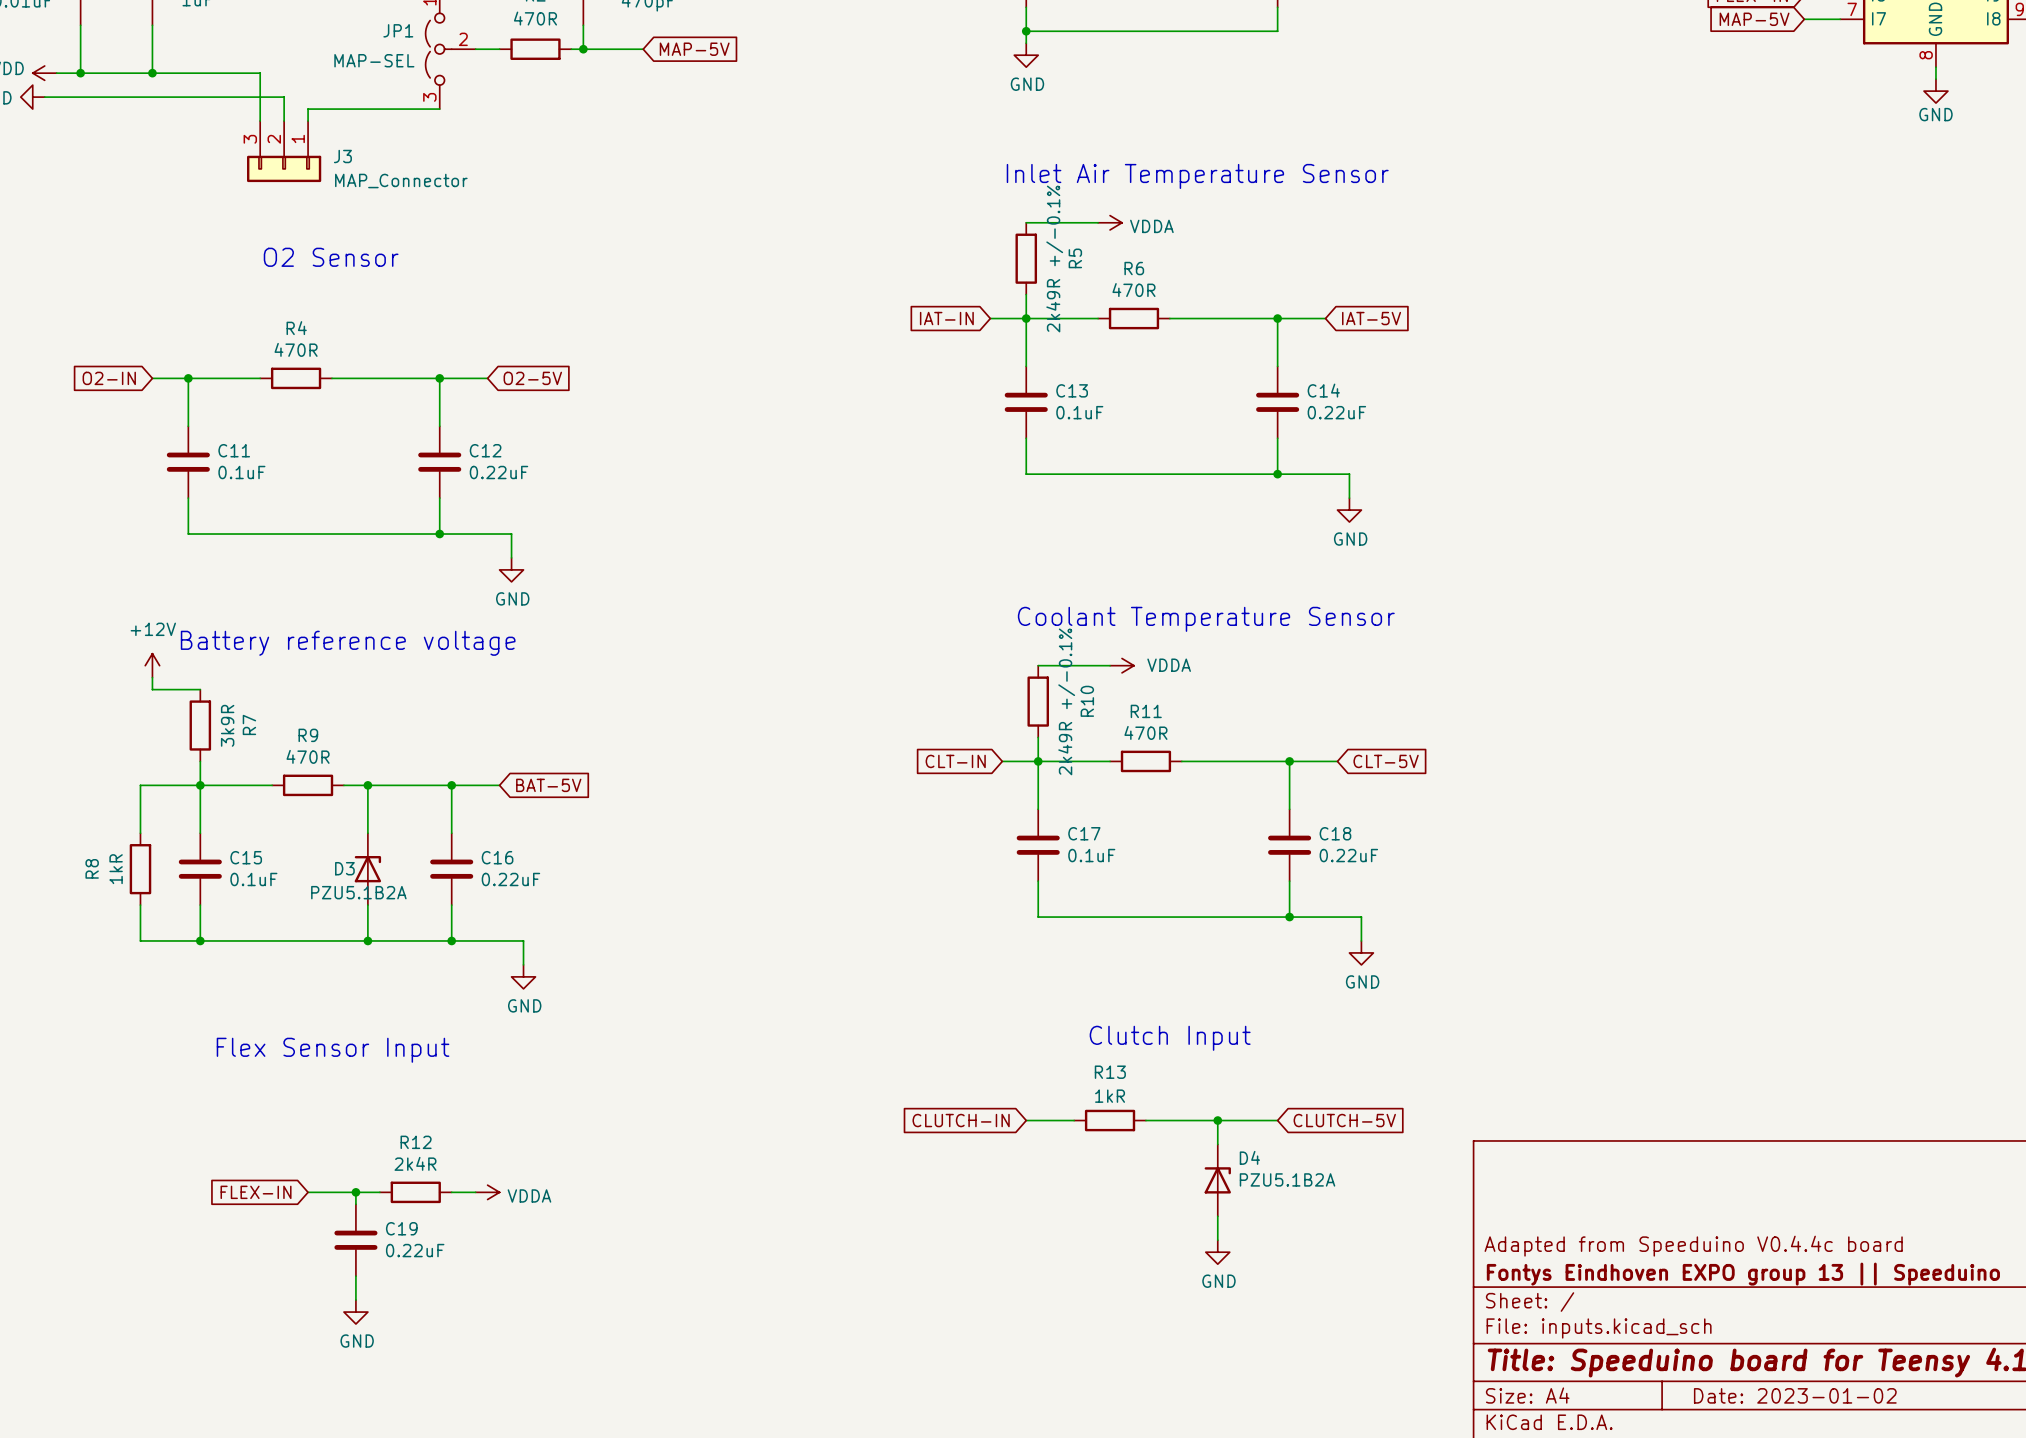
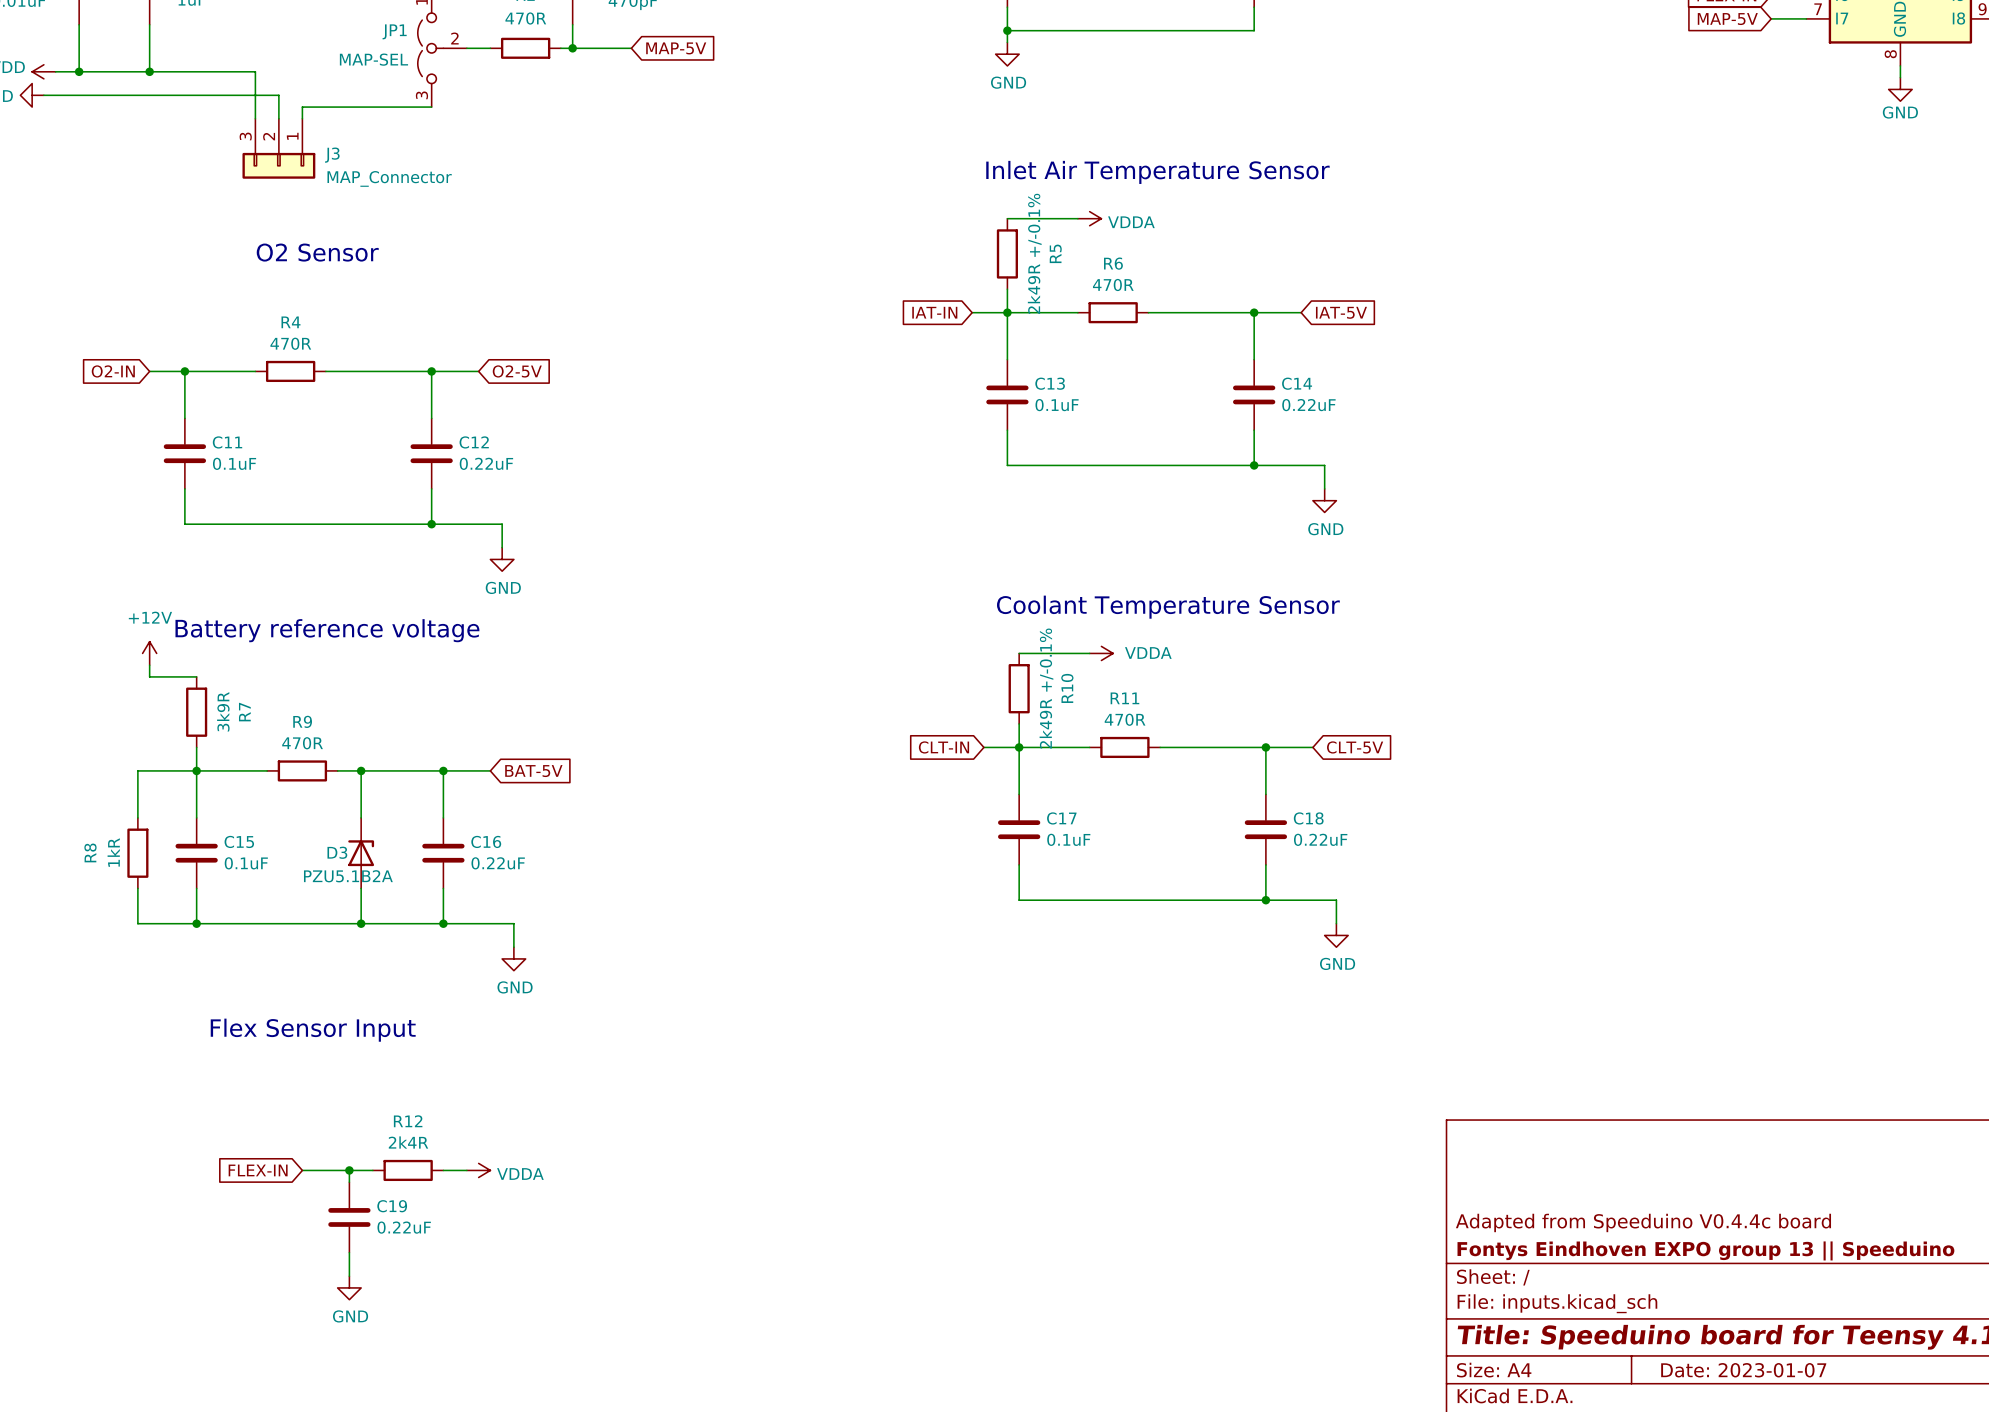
text: Clutch Input (1170, 1038) -> none
global label: CLUTCH-IN (961, 1120) -> none
wire: (1026, 1120) (1074, 1120) -> none
R13: 1kR (1110, 1120) -> none
wire: (1145, 1120) (1277, 1120) -> none
wire: (1217, 1120) (1217, 1144) -> none
junction: (1217, 1120) -> none
global label: CLUTCH-5V (1344, 1120) -> none
D4: PZU5.1B2A (1217, 1180) -> none
wire: (1217, 1216) (1217, 1240) -> none
power symbol: GND (1217, 1252) -> none
title block: Date: 2023-01-02 (1795, 1395) -> Date: 2023-01-07 (1743, 1370)

